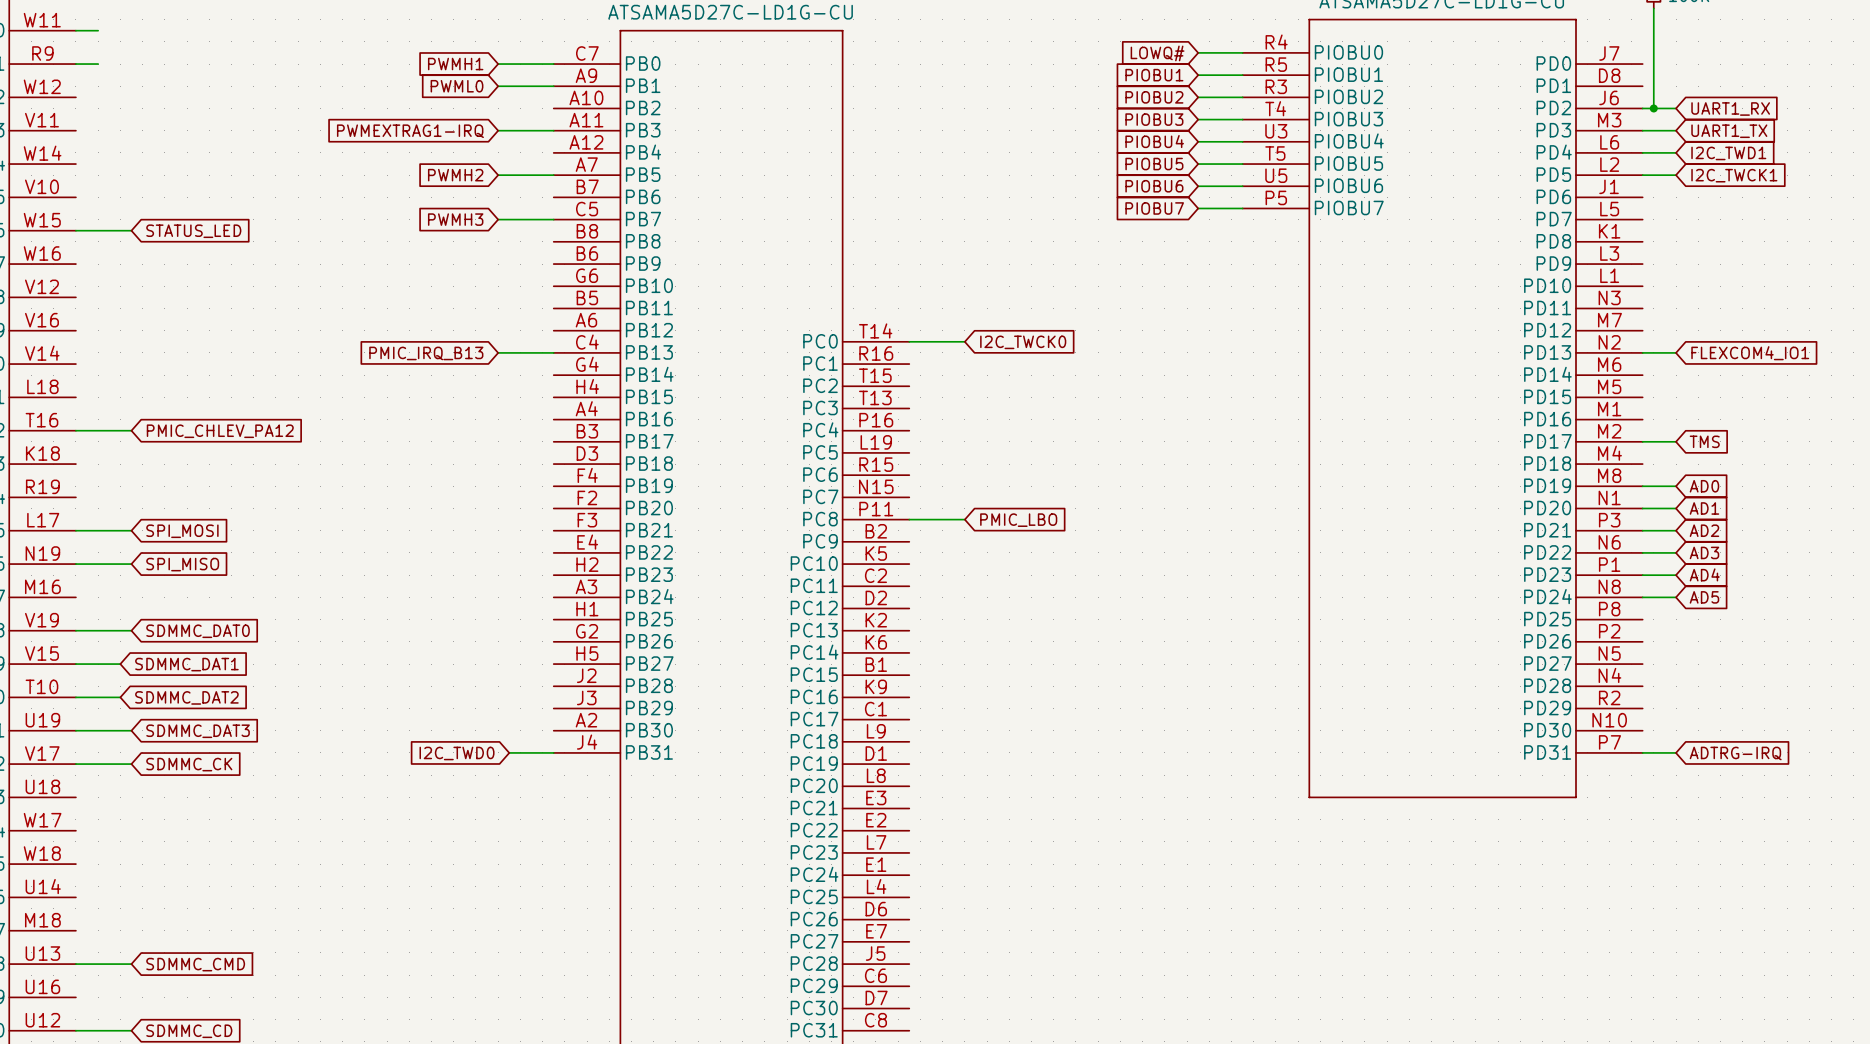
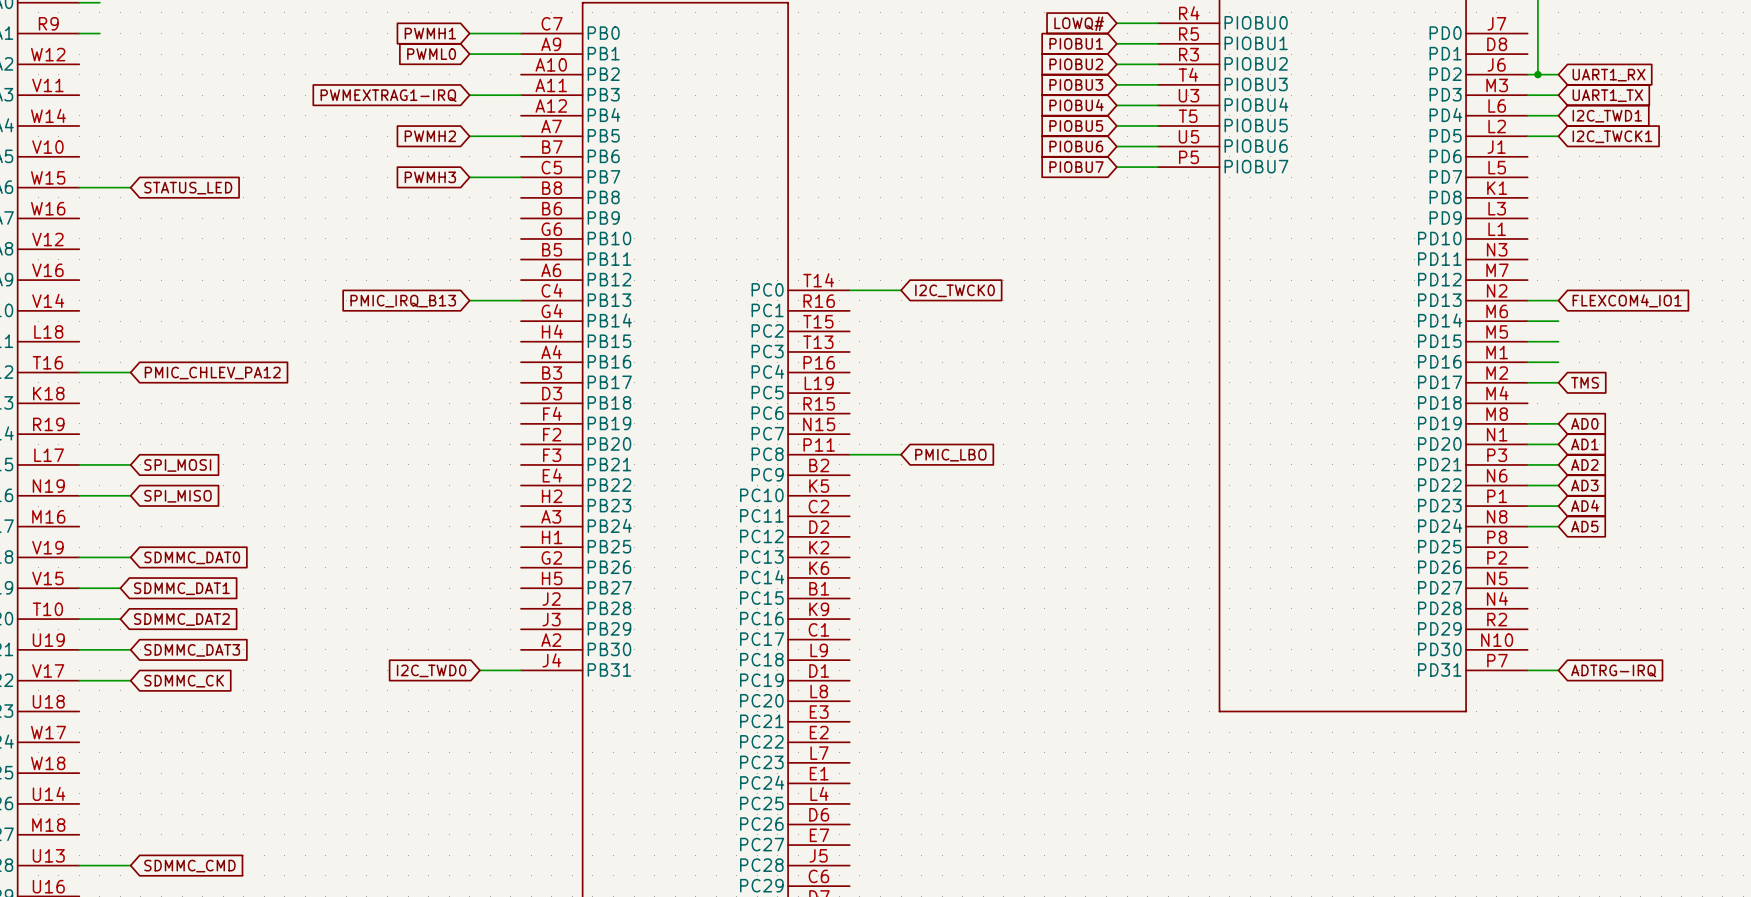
wire: none -> (1527, 321) (1558, 321)
wire: none -> (1527, 341) (1558, 341)
wire: none -> (1527, 362) (1558, 362)

